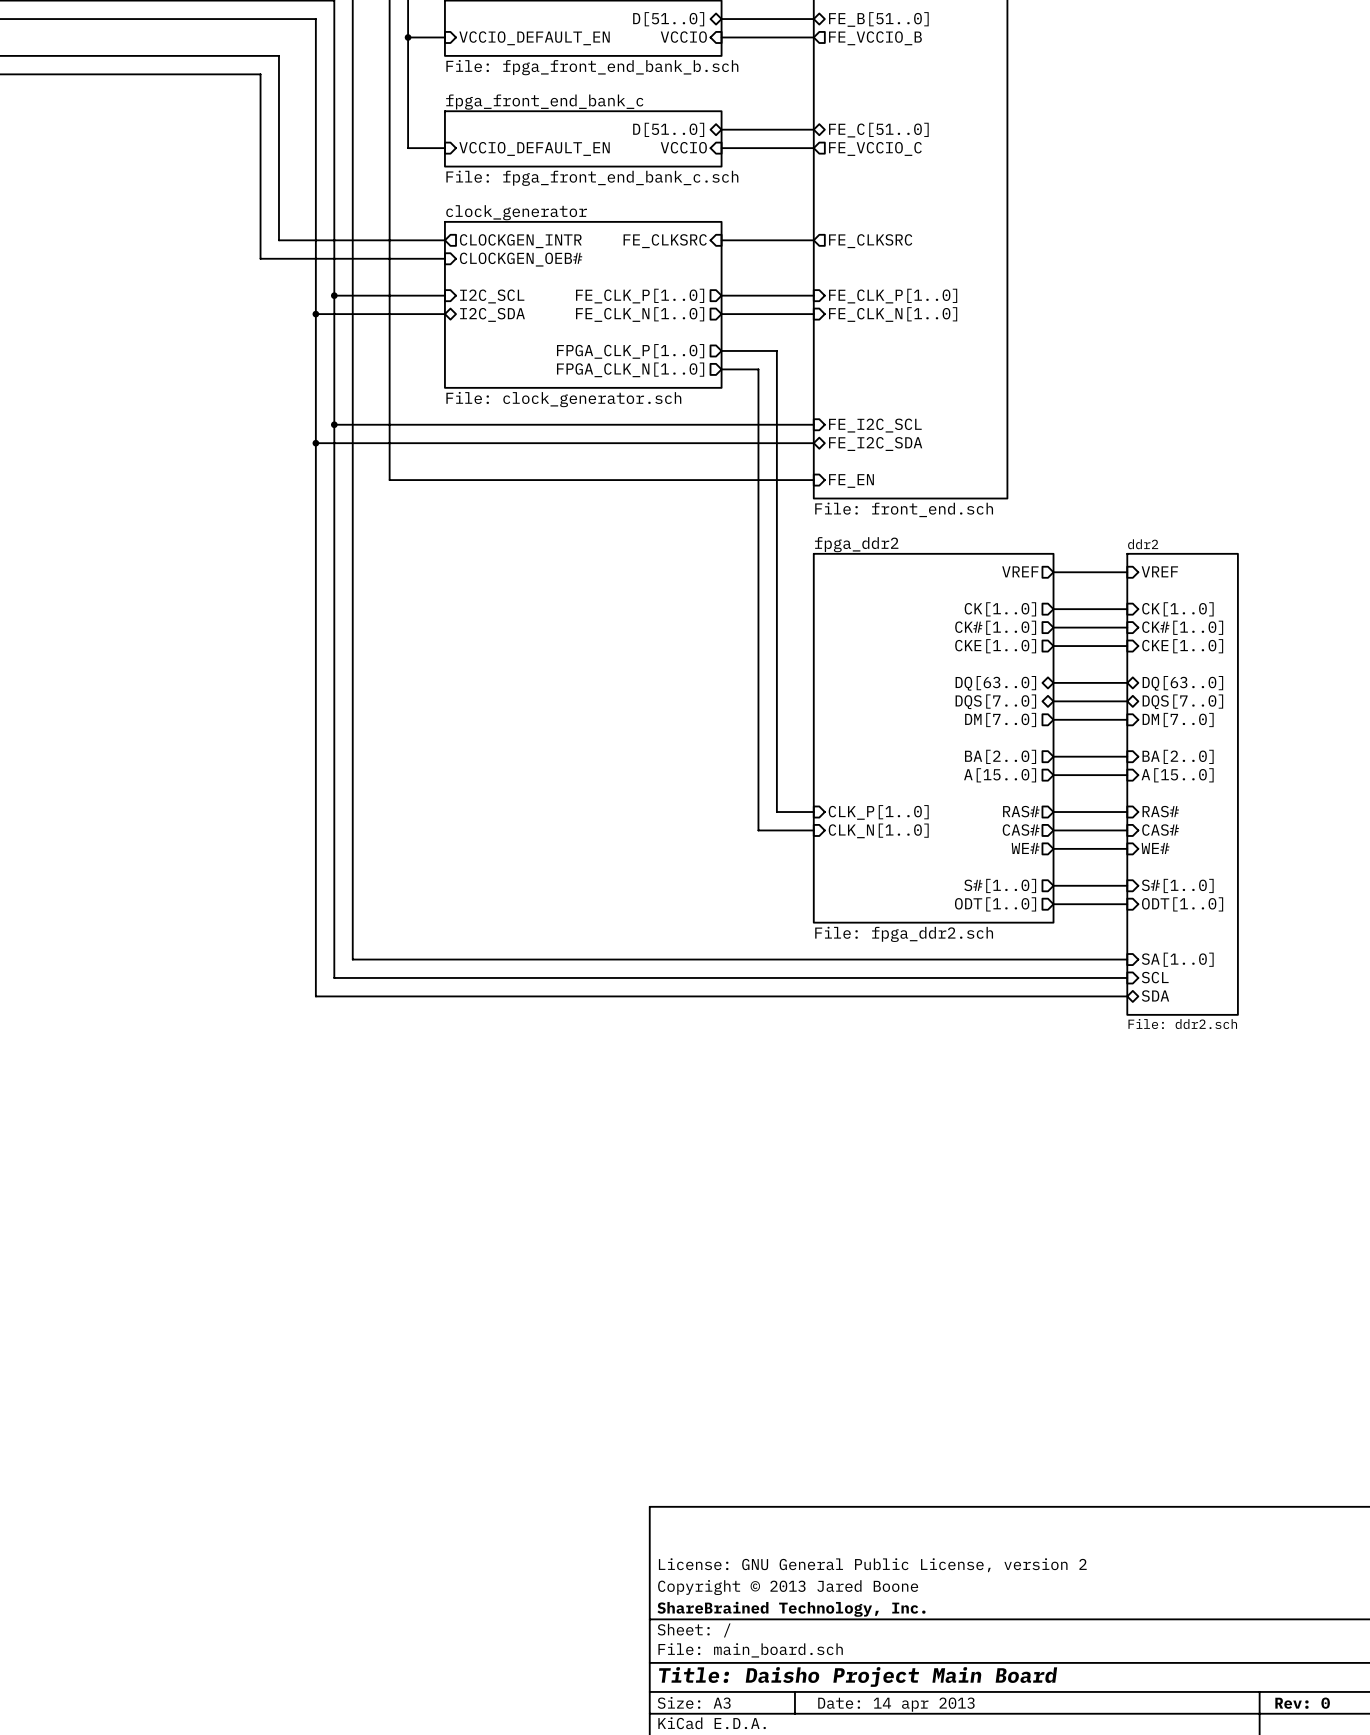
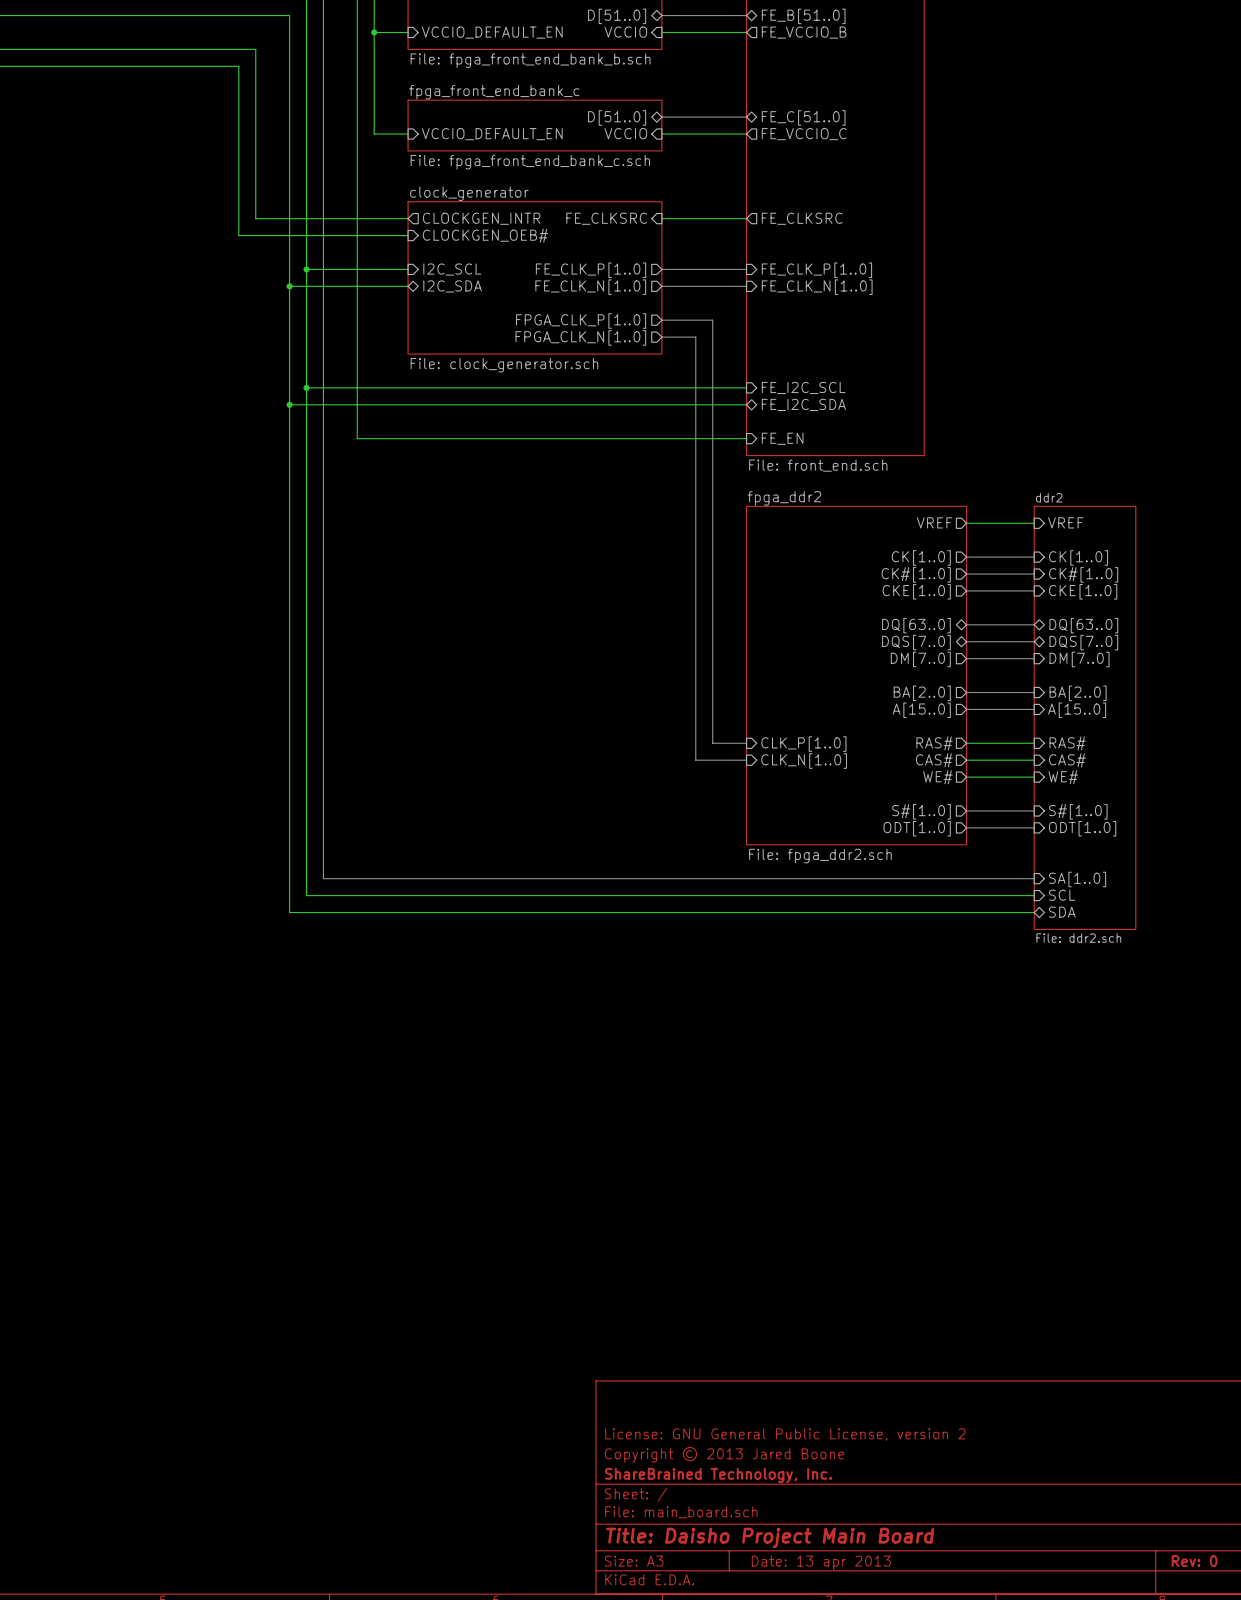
title block: Date: 14 apr 2013 (896, 1704) -> Date: 13 apr 2013 (821, 1562)

